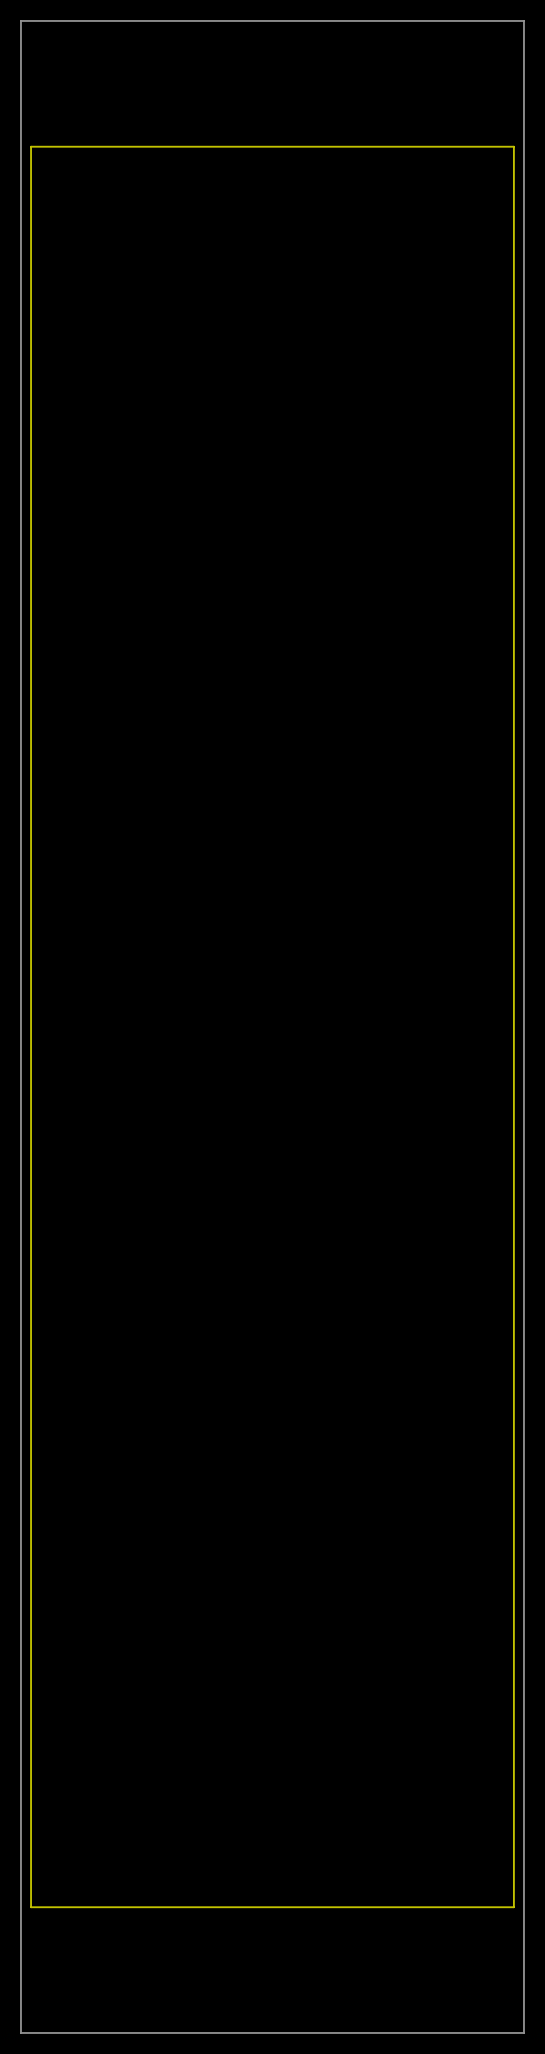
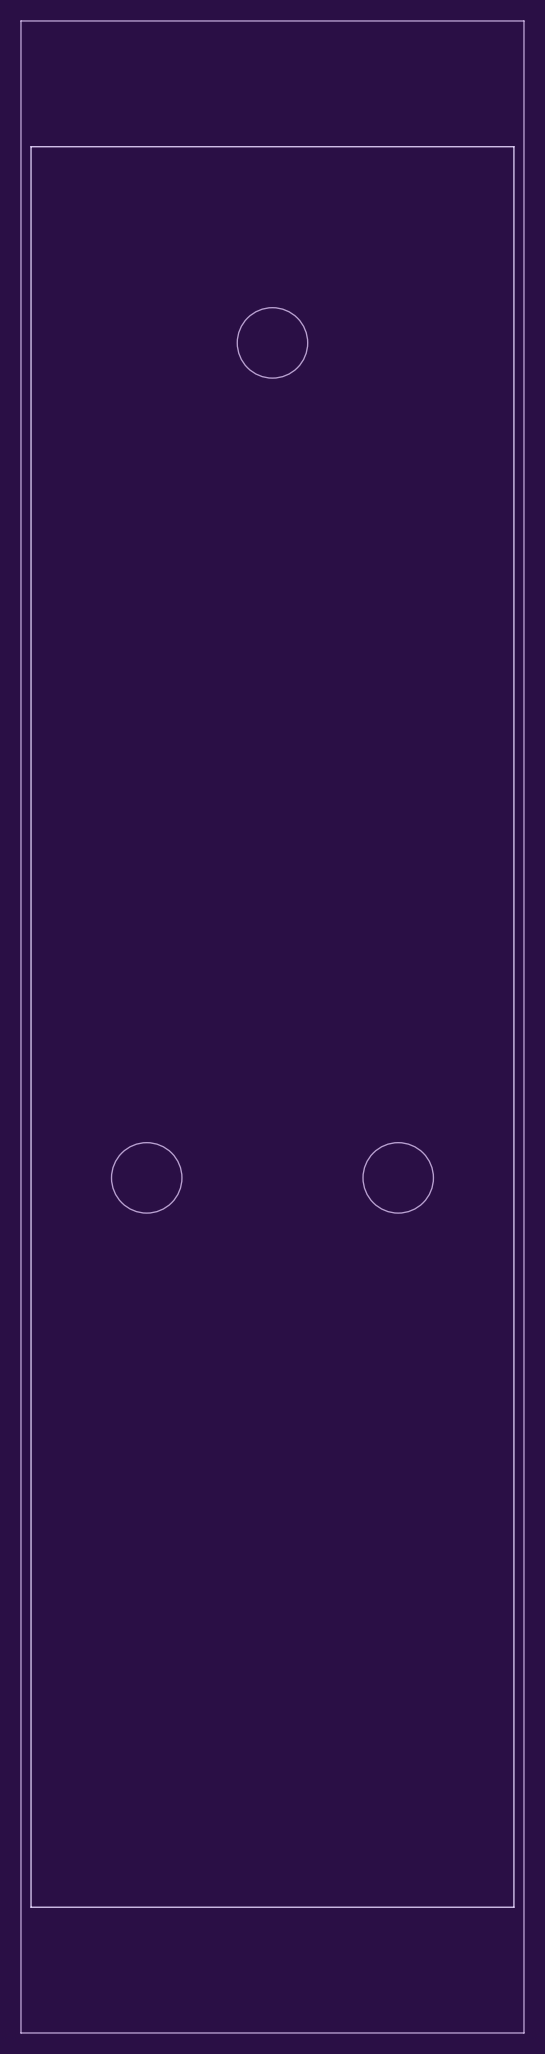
drawing: none -> [236, 307, 309, 379]
drawing: none -> [111, 1142, 183, 1214]
drawing: none -> [362, 1142, 434, 1214]

